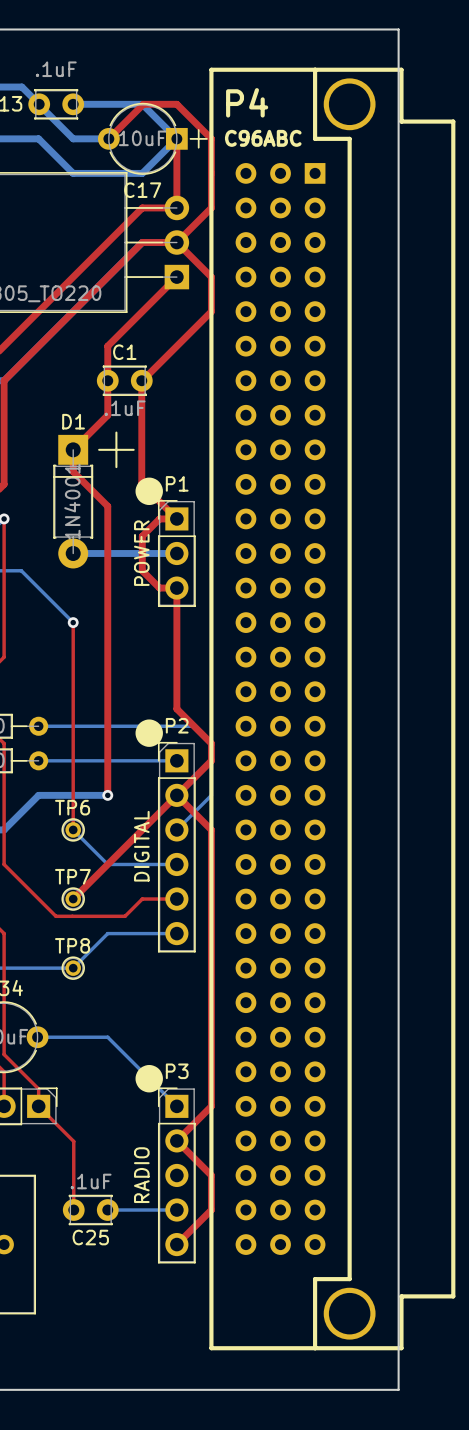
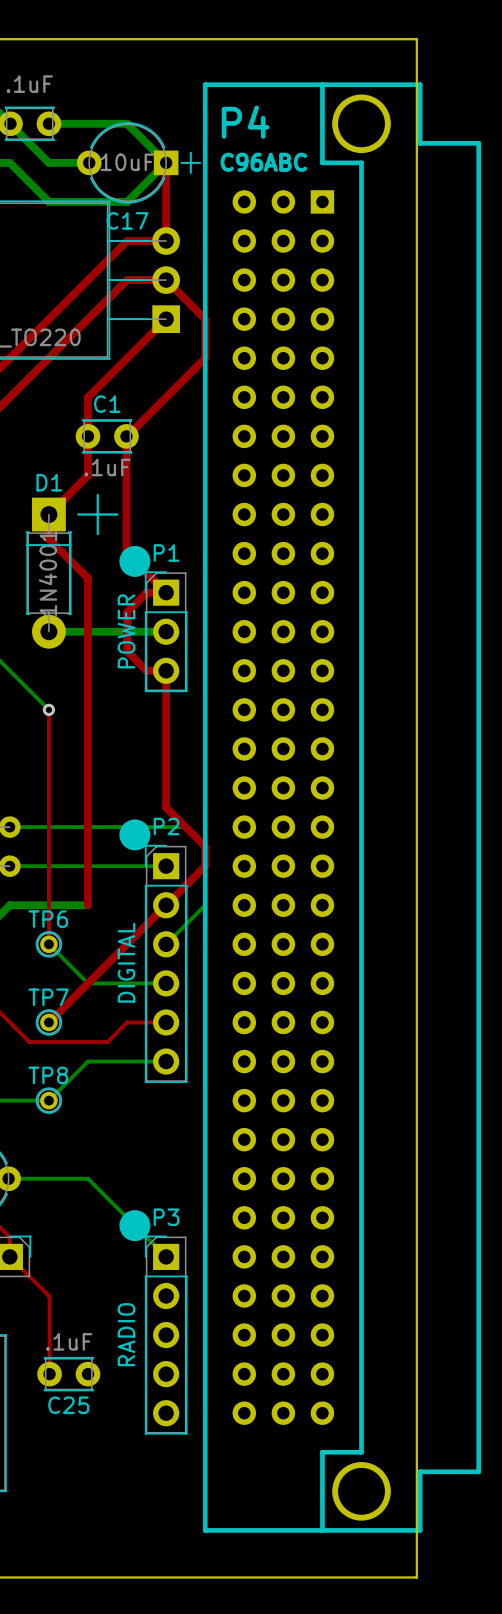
top track: (107, 139) (143, 104) (176, 104) (211, 138) (211, 207) (176, 242) -> none
via: (107, 795) -> none
top track: (176, 795) (211, 829) (211, 1106) (176, 1140) (211, 1175) (211, 1210) (176, 1244) -> none
bottom track: (107, 1210) (176, 1210) -> none

